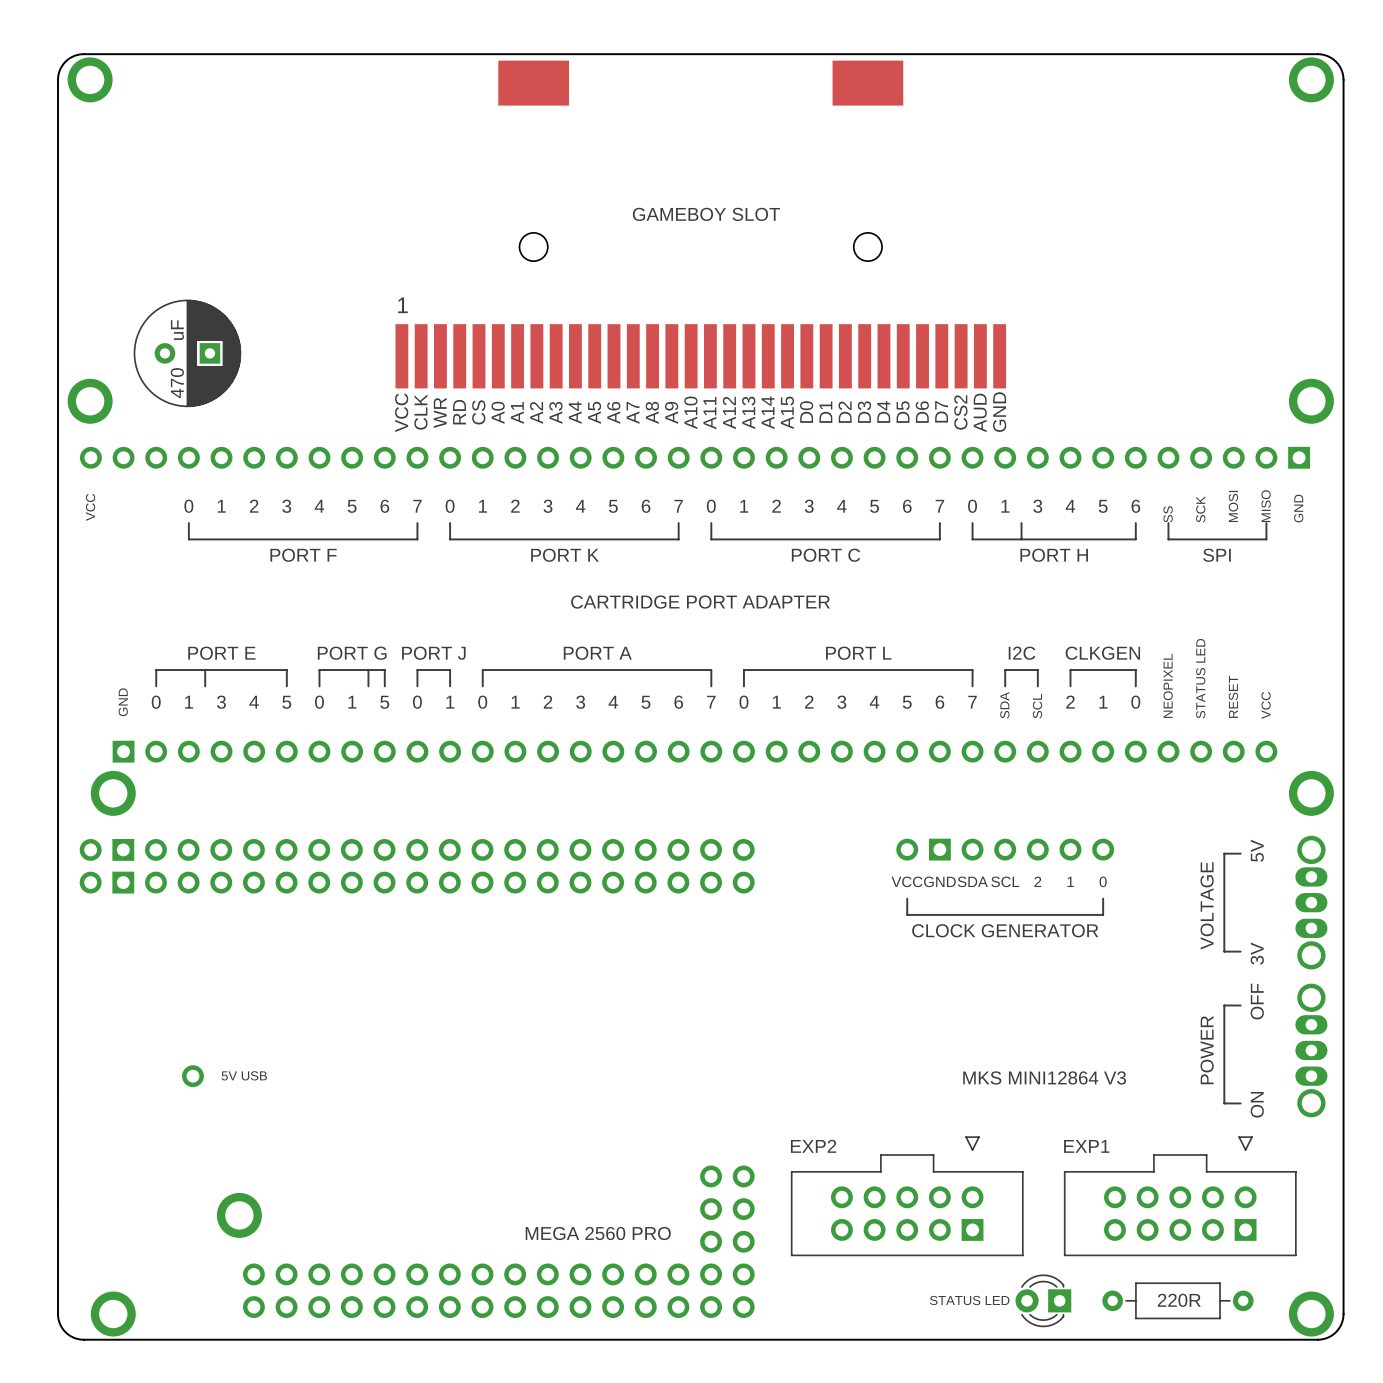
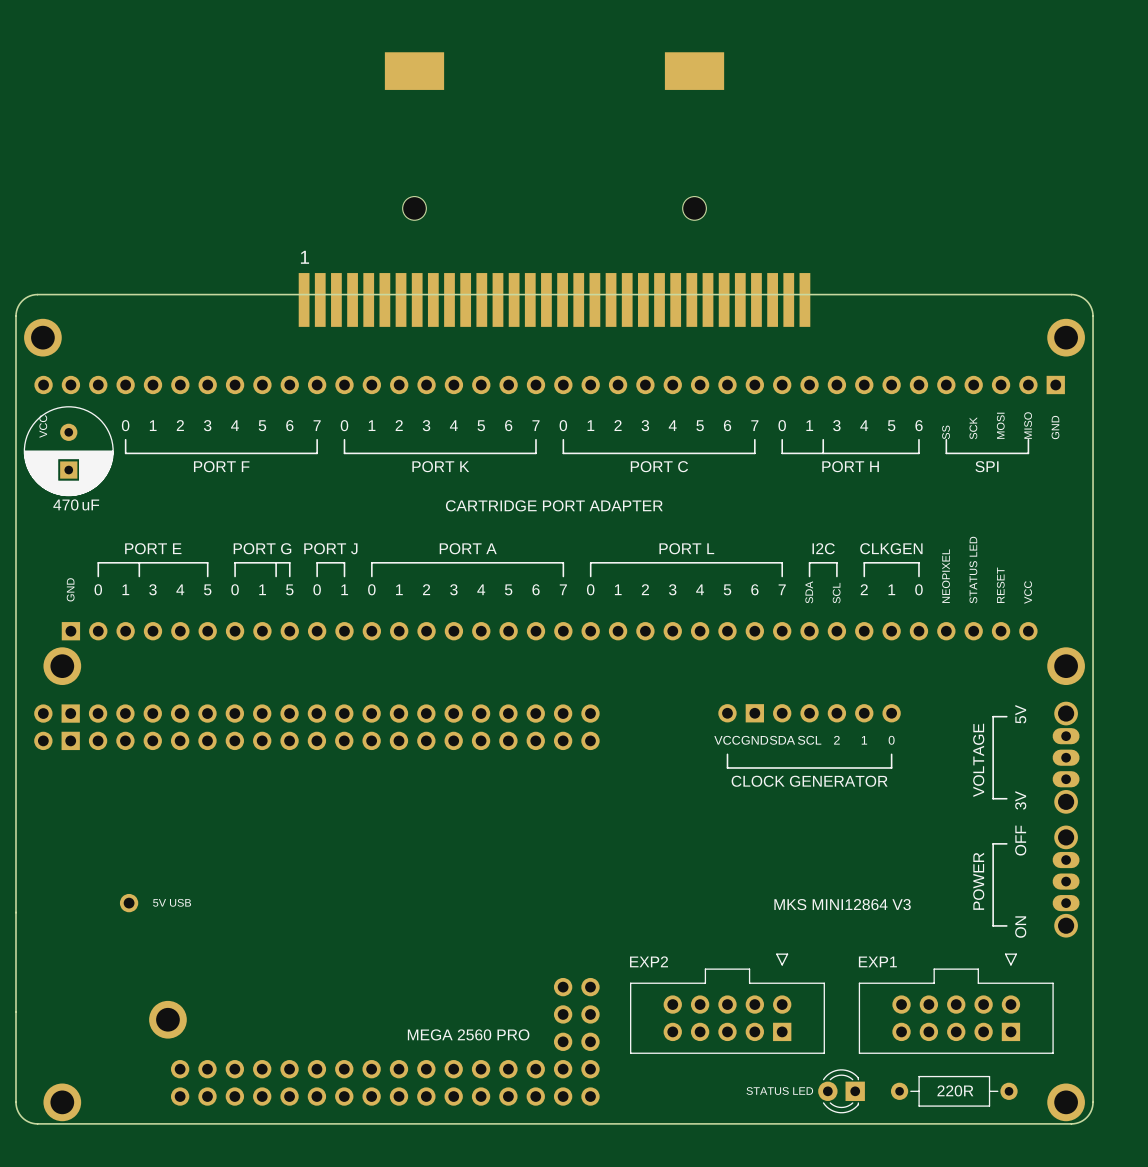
part: (90, 79) -> none
part: (1311, 79) -> none
text: GAMEBOY SLOT (706, 214) -> none
text rotation: 0° (177, 330) -> 90° clockwise (90, 505)
text position: uF (177, 330) -> uF (90, 505)
part rotation: 0° (187, 353) -> 90° clockwise (68, 451)
part position: (187, 353) -> (68, 451)
board edge: (58, 375) (58, 77) (60, 68) (67, 59) (83, 54) (1324, 55) (1338, 64) (1343, 79) (1343, 375) -> (15, 316) (18, 306) (22, 300) (30, 295) (37, 294) (1071, 294) (1080, 296) (1086, 300) (1090, 306) (1093, 316)
text rotation: 0° (177, 383) -> 90° clockwise (65, 504)
text position: 470 (177, 383) -> 470 (65, 504)
text: D4 (883, 411) -> none
text: D7 (941, 411) -> none
text: VCC (401, 412) -> none
text: CLK (420, 412) -> none
text: WR (440, 412) -> none
text: RD (459, 412) -> none
text: CS (478, 412) -> none
text: A0 (498, 412) -> none
text: A1 (517, 412) -> none
text: A2 (536, 412) -> none
text: A3 (555, 412) -> none
text: A4 (575, 412) -> none
text: A5 (594, 412) -> none
text: A6 (613, 412) -> none
text: A7 (633, 412) -> none
text: A8 (652, 412) -> none
text: A9 (671, 412) -> none
text: A10 (690, 412) -> none
text: A12 (729, 412) -> none
text: A13 (748, 412) -> none
text: A14 (768, 412) -> none
text: A15 (787, 412) -> none
text: D0 (806, 412) -> none
text: D1 (825, 412) -> none
text: D2 (845, 412) -> none
text: D3 (864, 412) -> none
text: D5 (903, 412) -> none
text: D6 (922, 412) -> none
text: CS2 (960, 412) -> none
text: AUD (980, 412) -> none
text: GND (999, 412) -> none
text: A11 (709, 413) -> none

